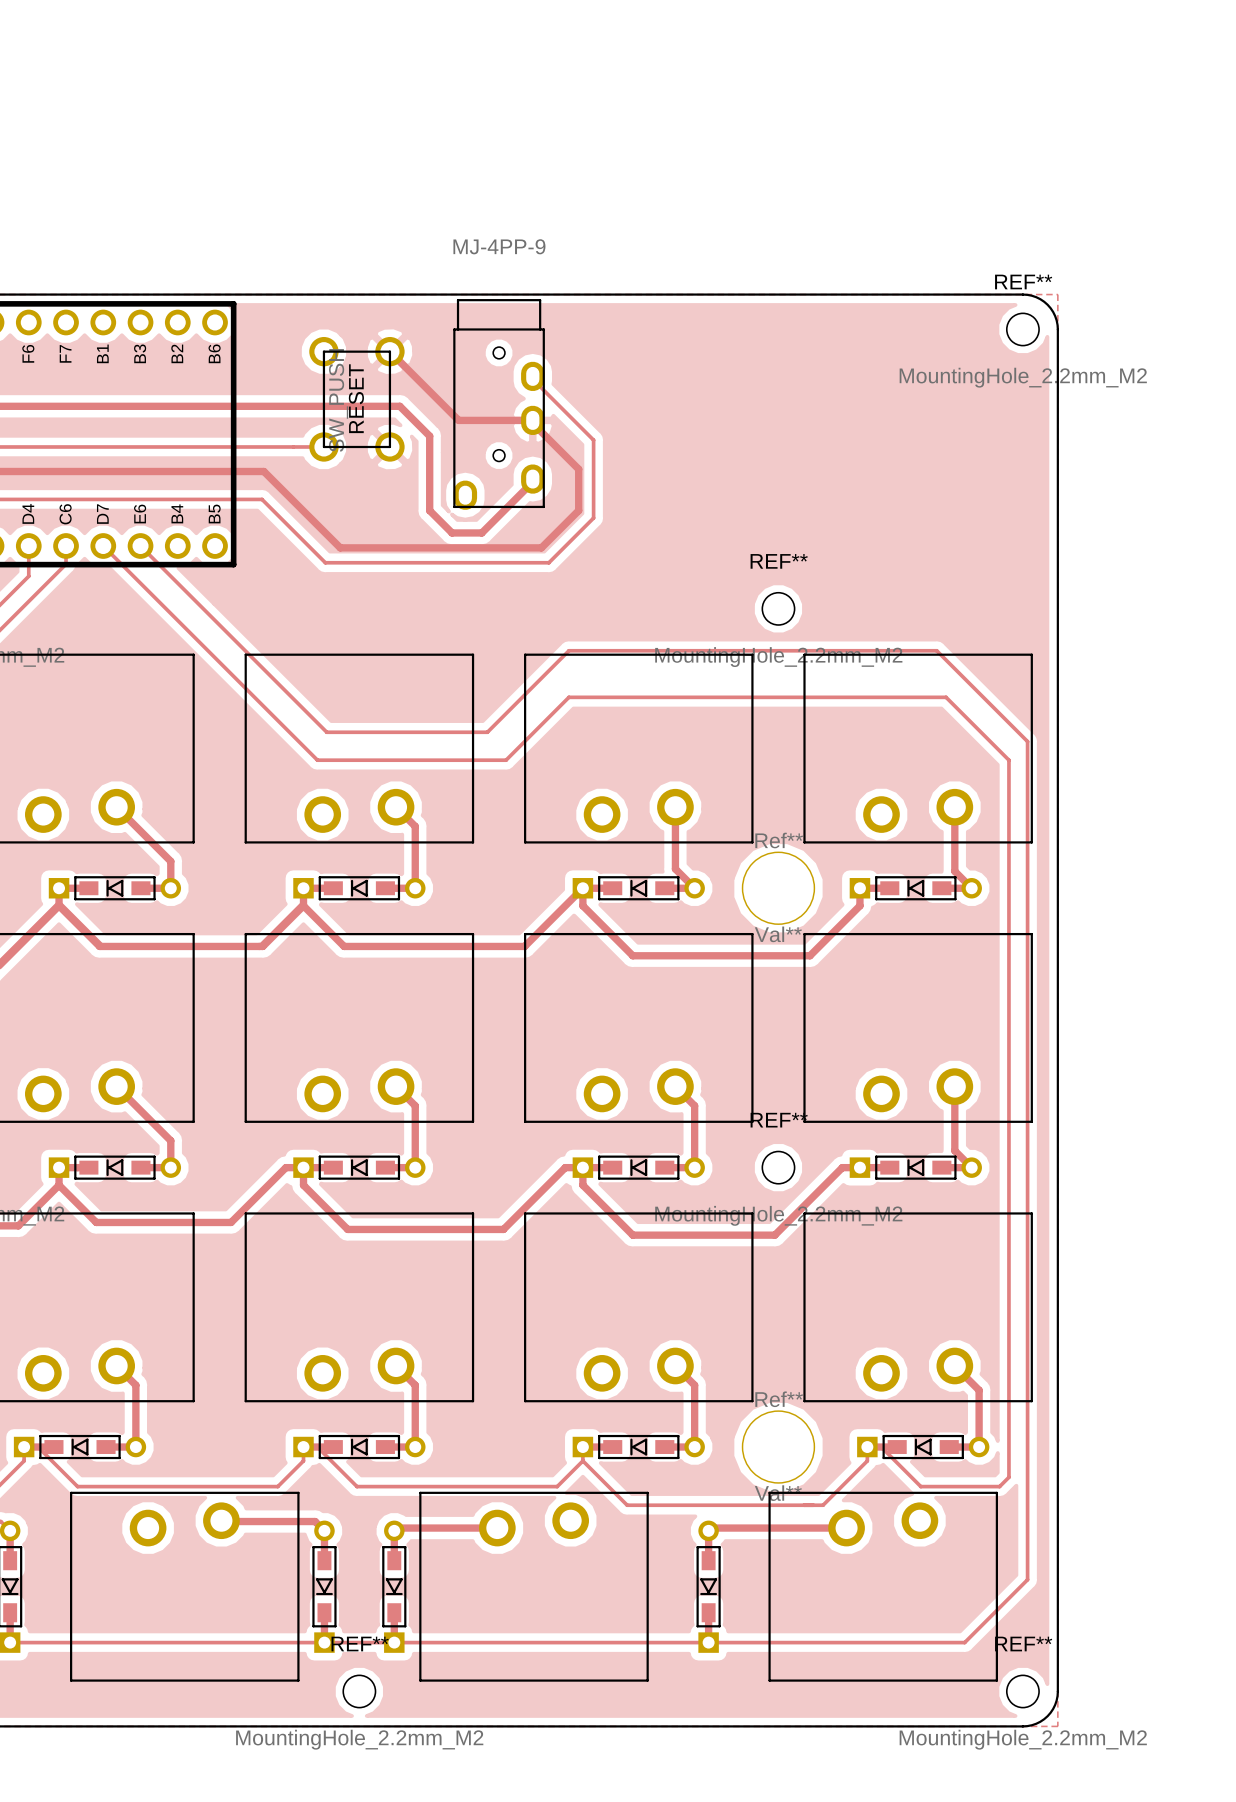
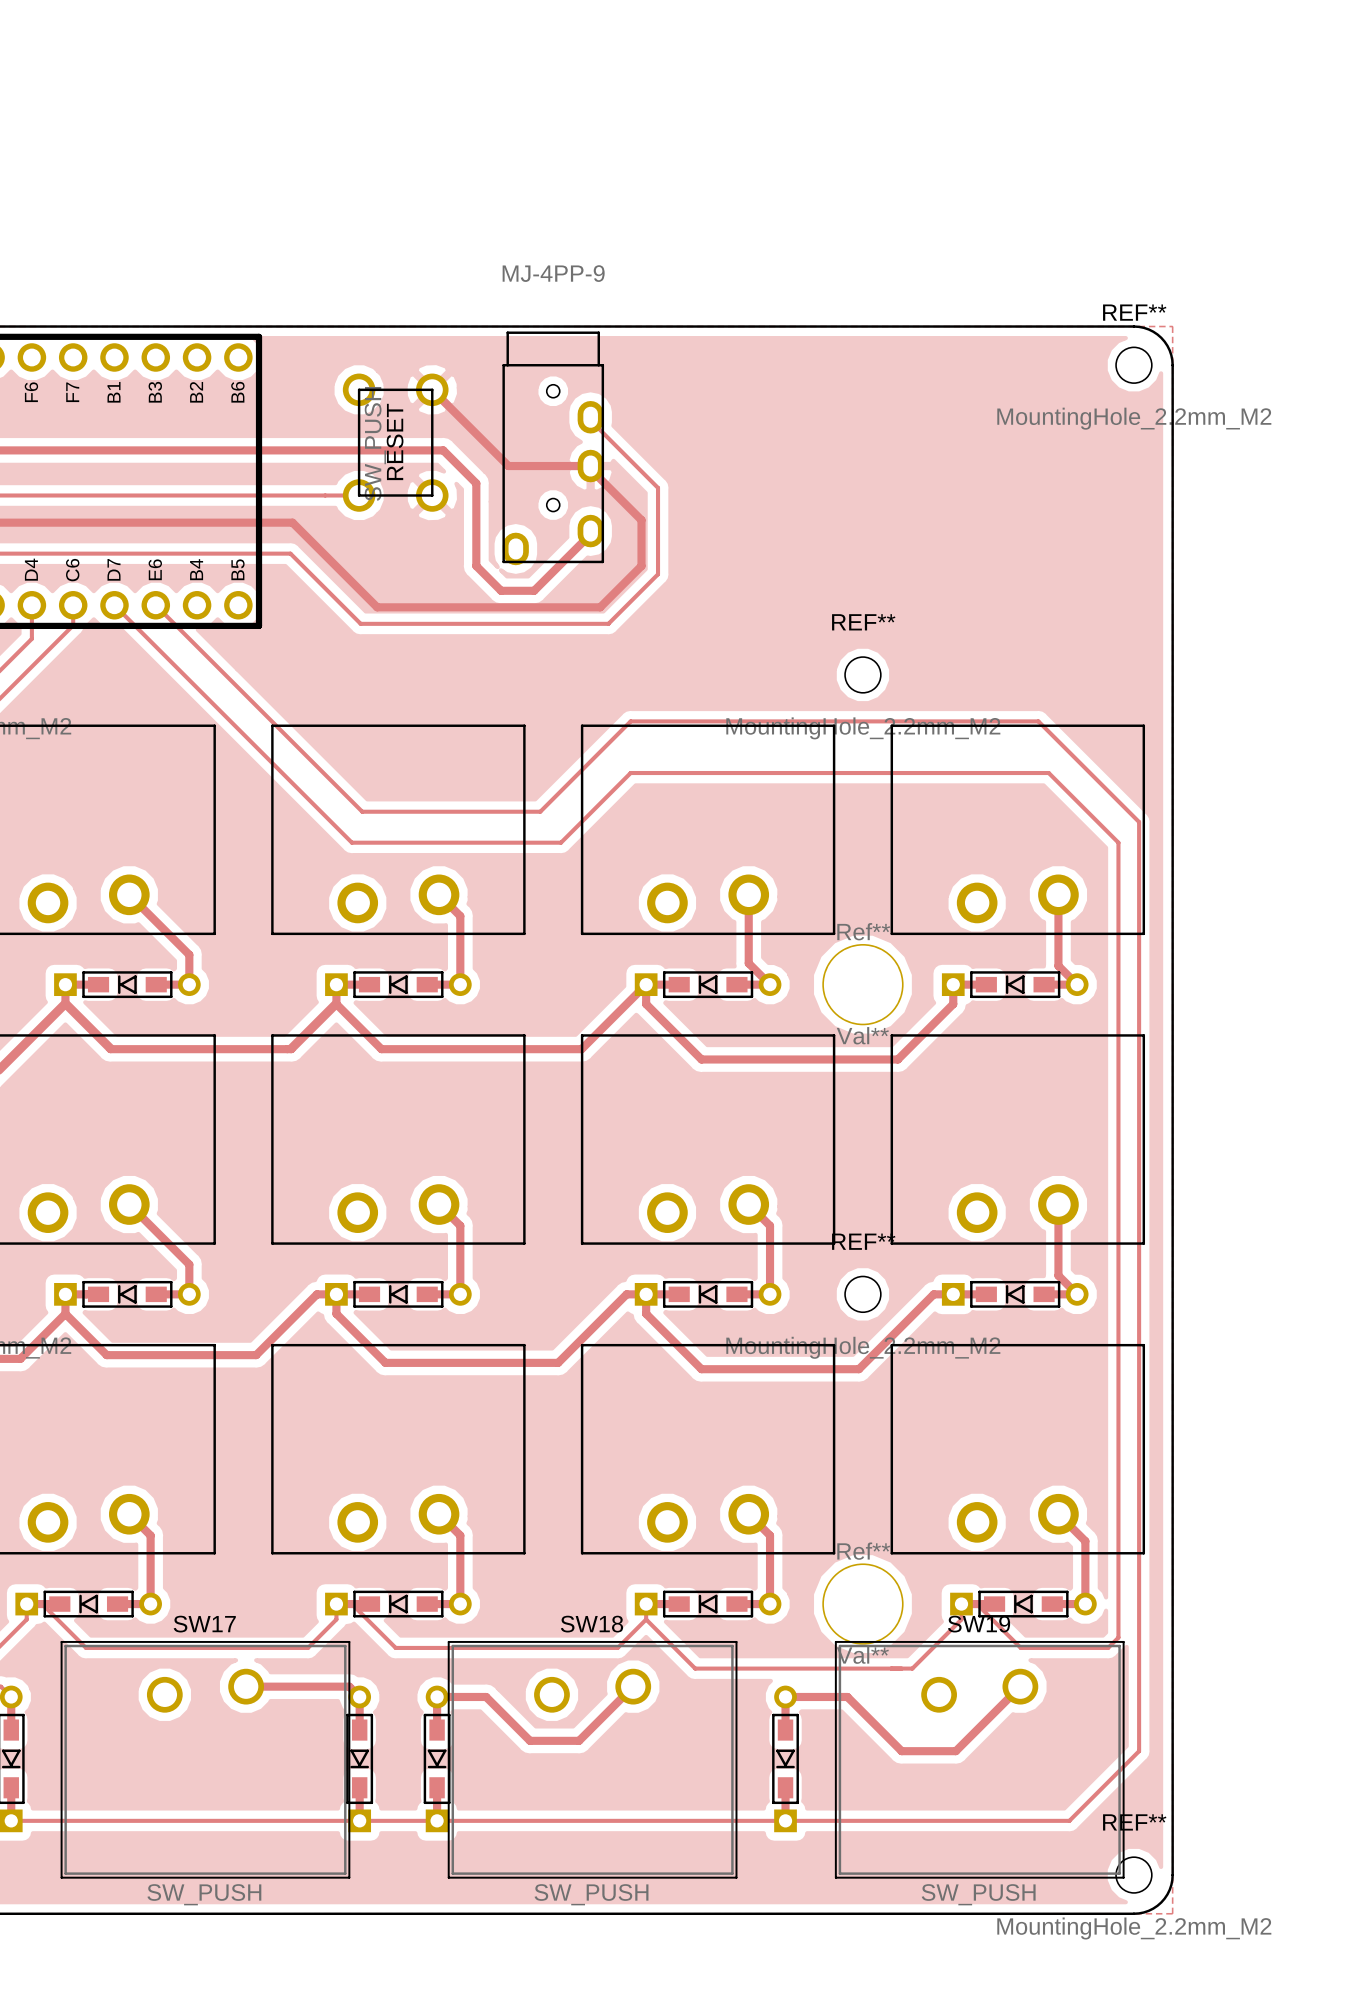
track: (497, 1528) (397, 1528) (394, 1530) -> (633, 1686) (579, 1740) (530, 1740) (486, 1696) (437, 1696)
track: (846, 1528) (711, 1528) (708, 1530) -> (1020, 1686) (955, 1751) (901, 1751) (847, 1696) (785, 1696)
part: (184, 1586) -> none
part: (534, 1586) -> none
part: (883, 1586) -> none
SW17: none -> SW_PUSH (205, 1759)
SW18: none -> SW_PUSH (592, 1759)
SW19: none -> SW_PUSH (979, 1759)
REF**: MountingHole_2.2mm_M2 (359, 1691) -> none

